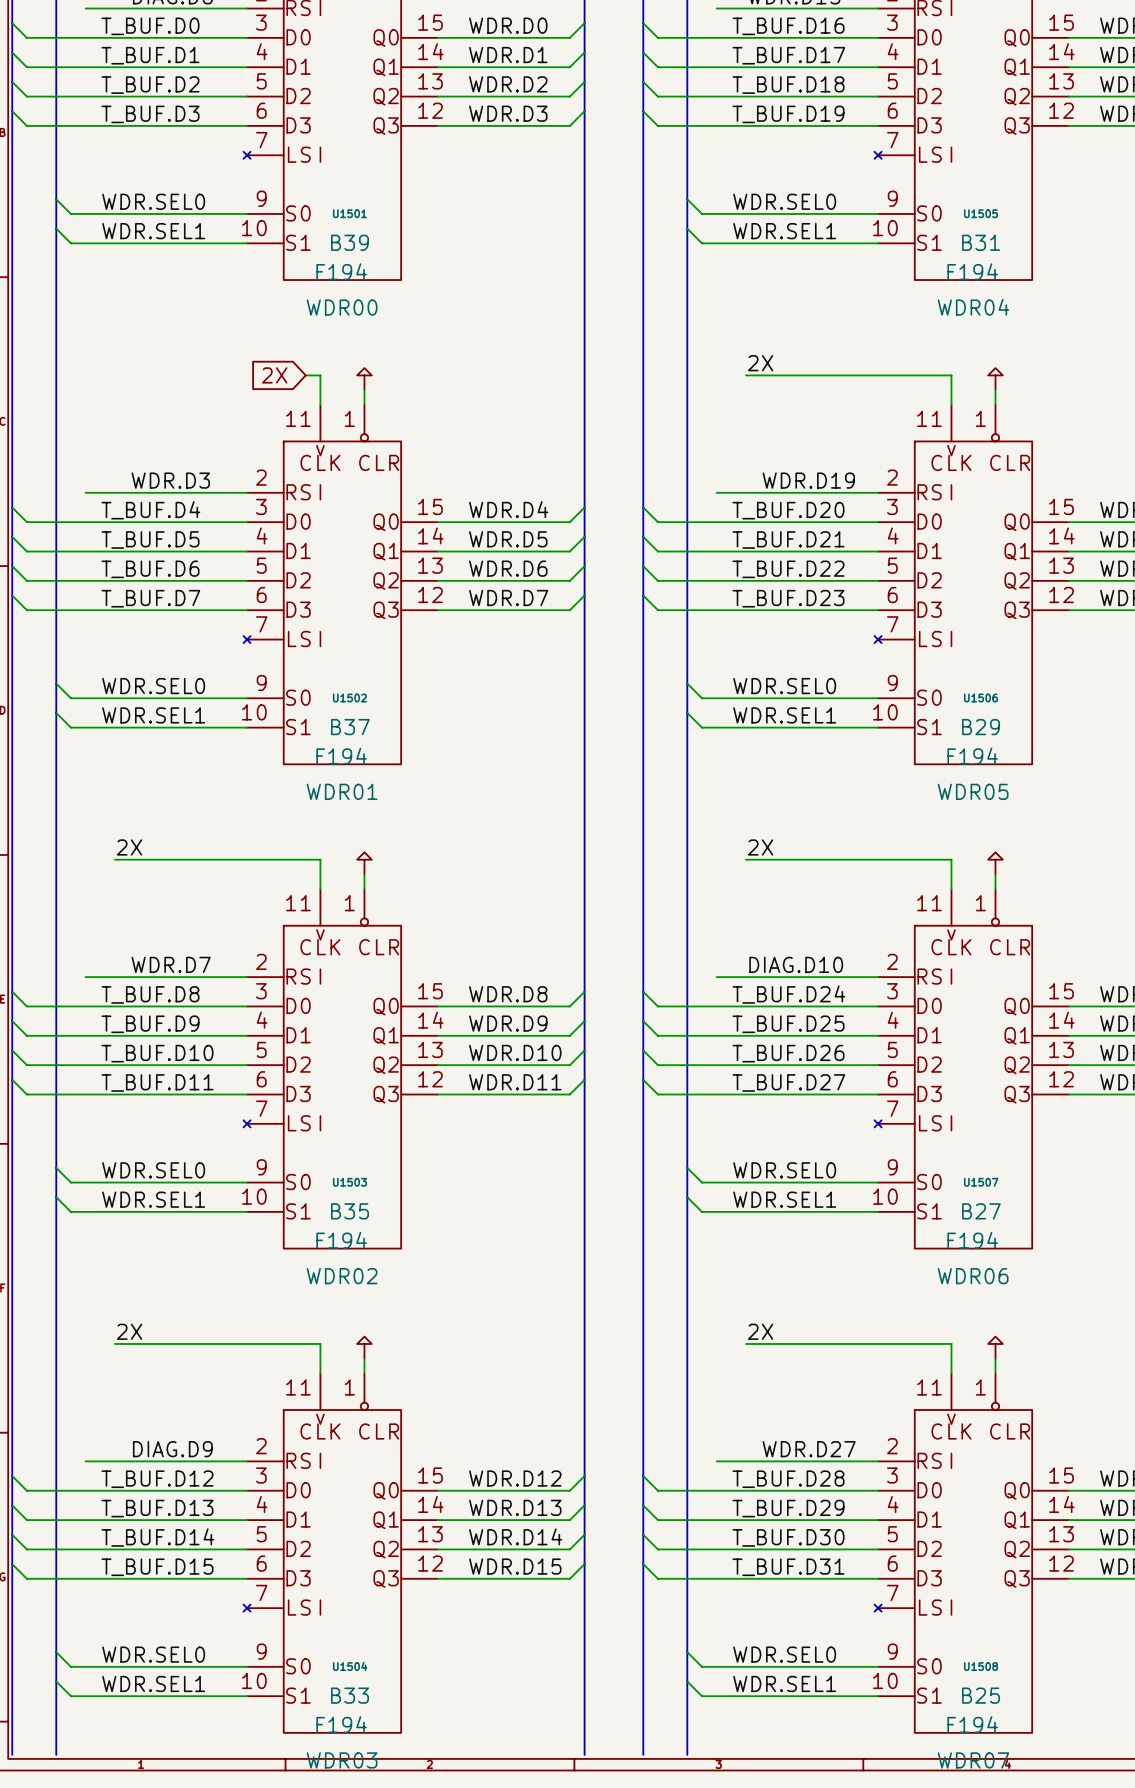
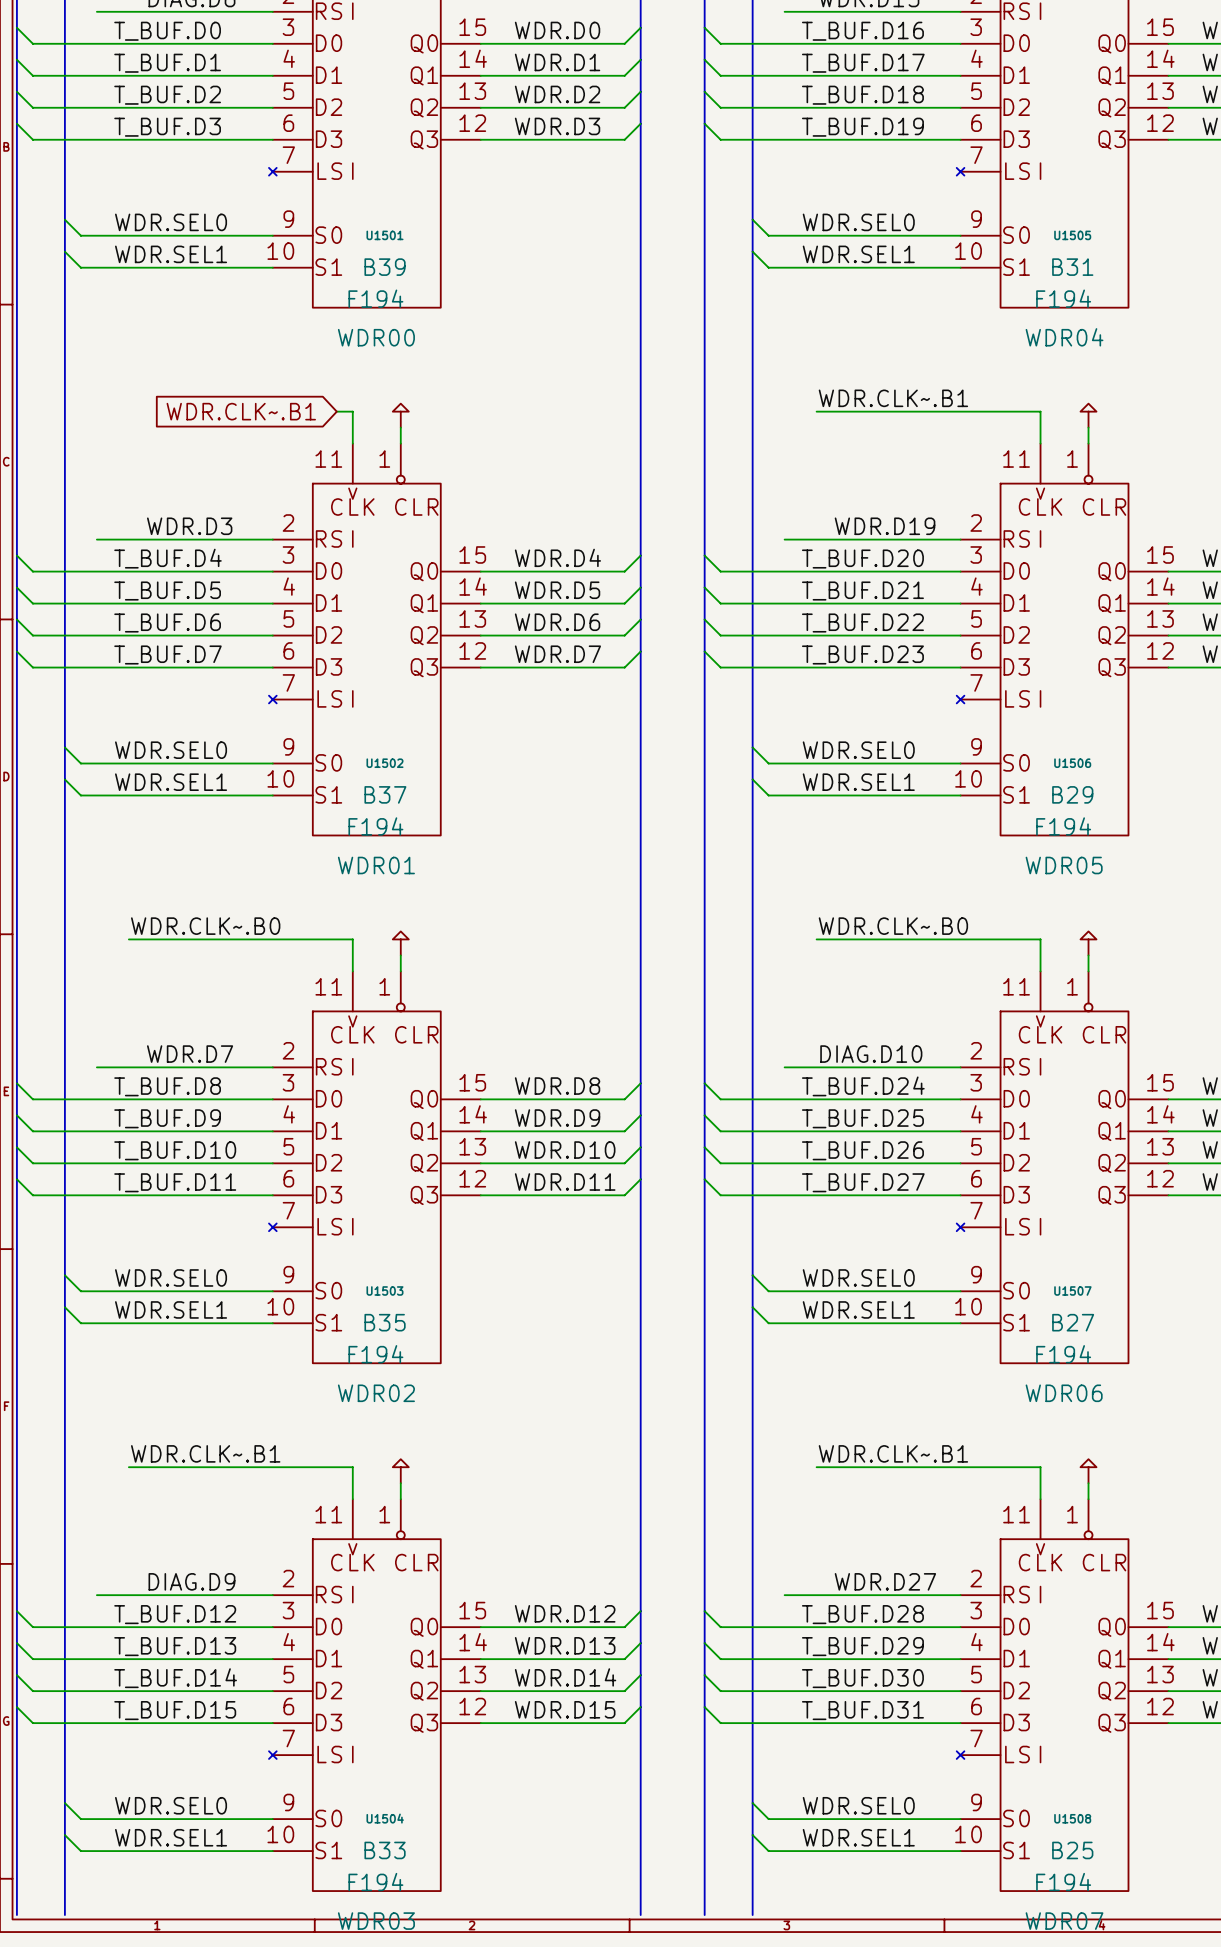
label: 2X (760, 363) -> WDR.CLK~.B1 (893, 398)
global label: 2X (274, 375) -> WDR.CLK~.B1 (241, 411)
label: 2X (129, 847) -> WDR.CLK~.B0 (205, 926)
label: 2X (760, 847) -> WDR.CLK~.B0 (893, 926)
label: 2X (129, 1331) -> WDR.CLK~.B1 (205, 1453)
label: 2X (760, 1331) -> WDR.CLK~.B1 (893, 1453)

